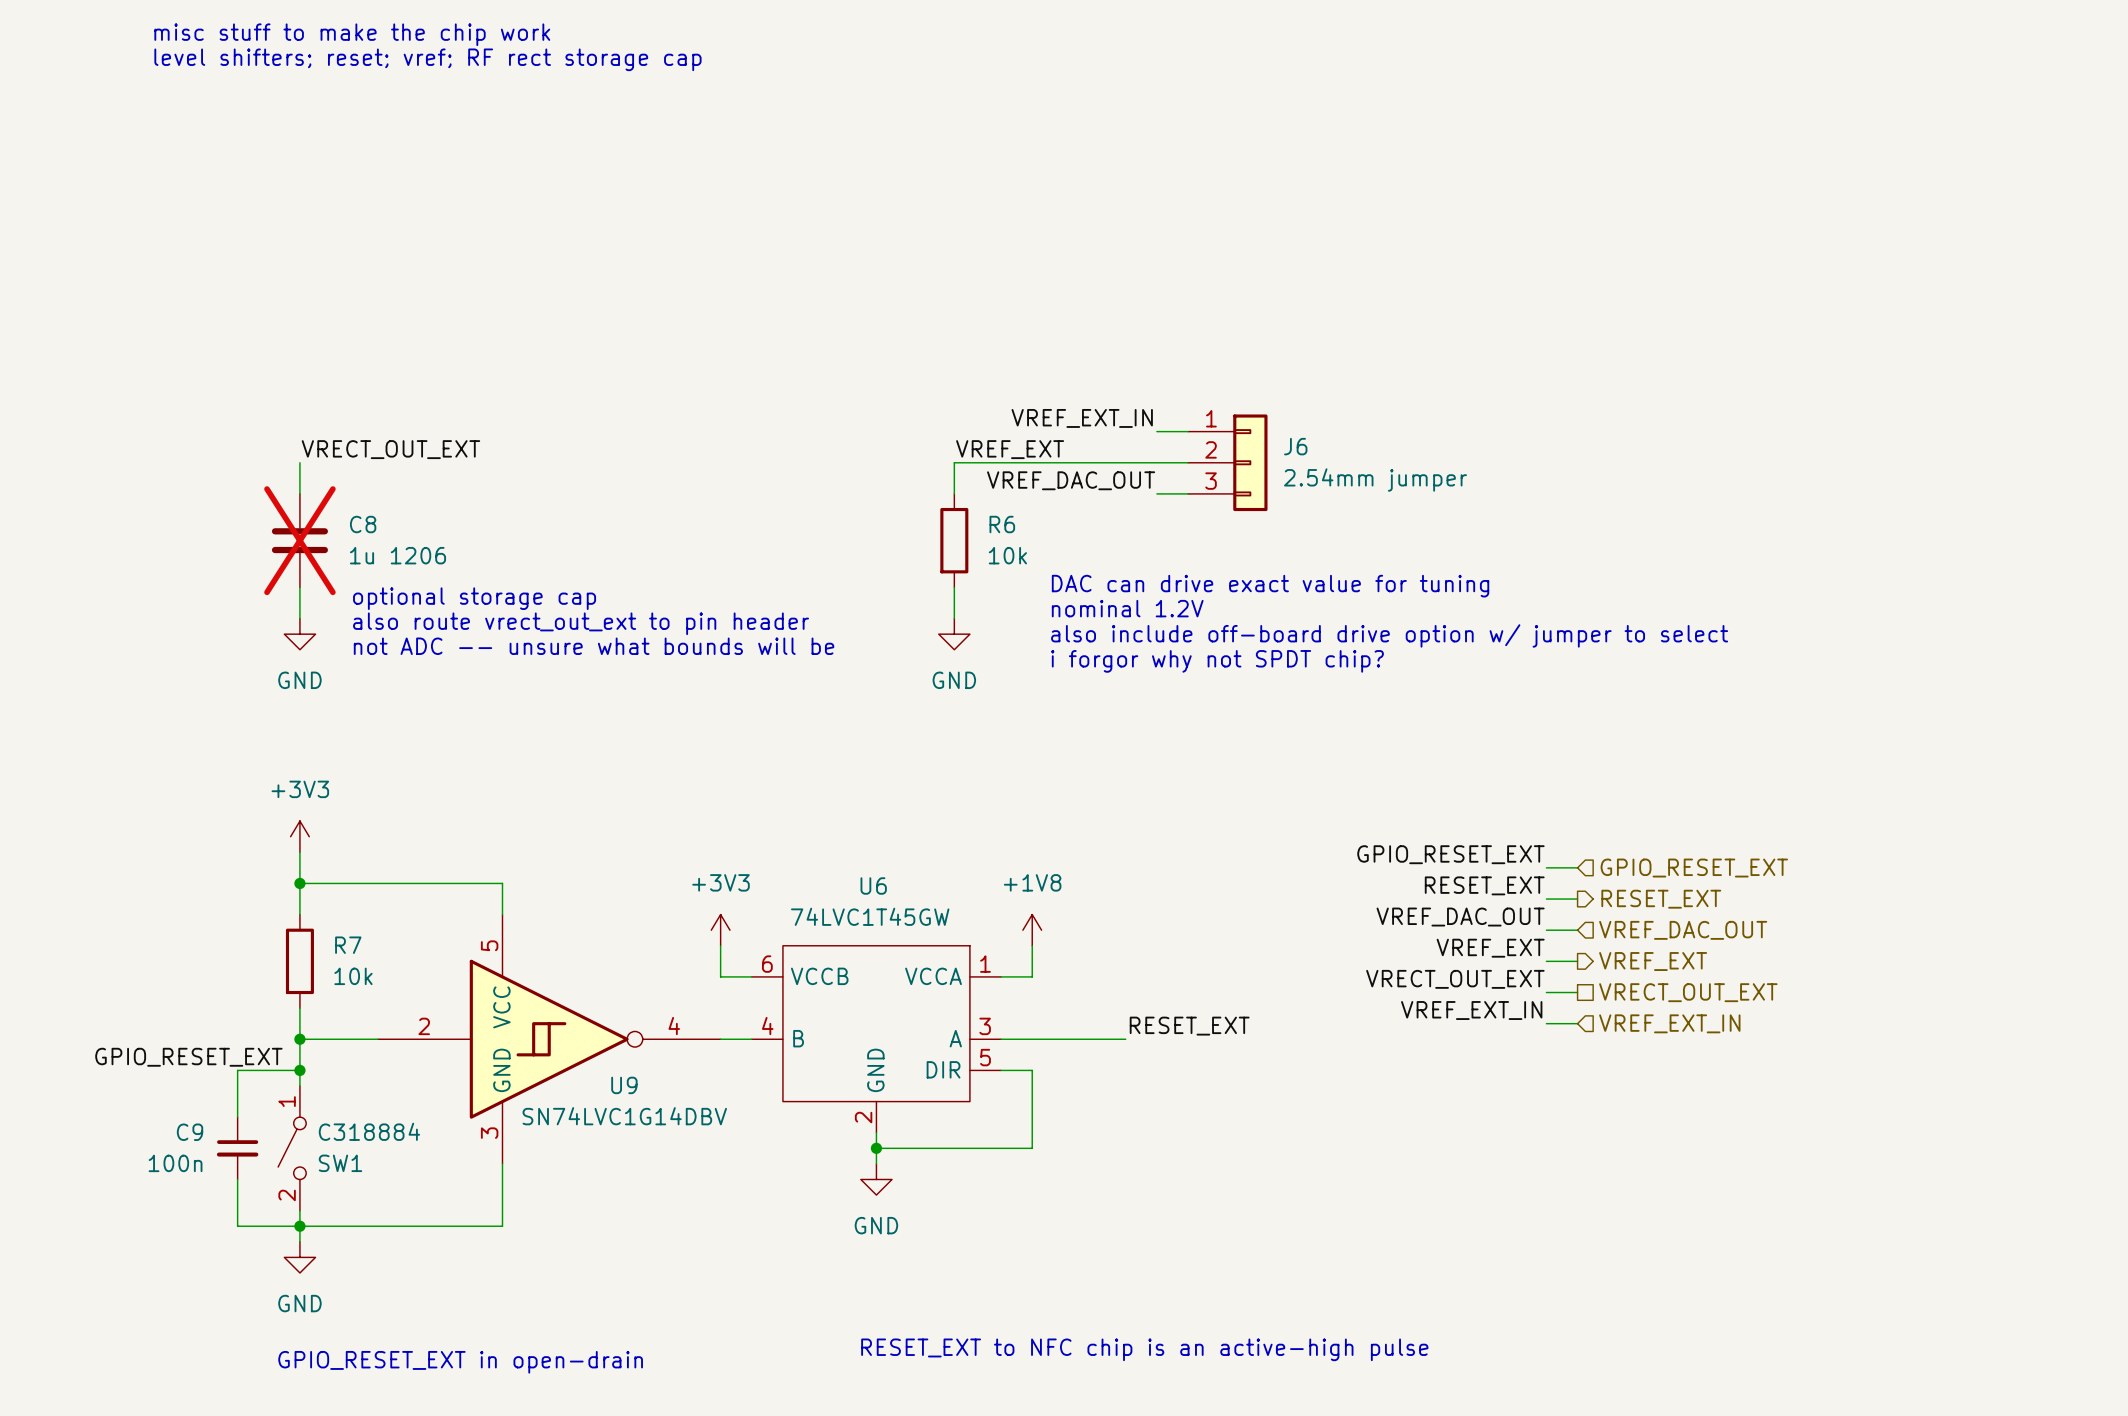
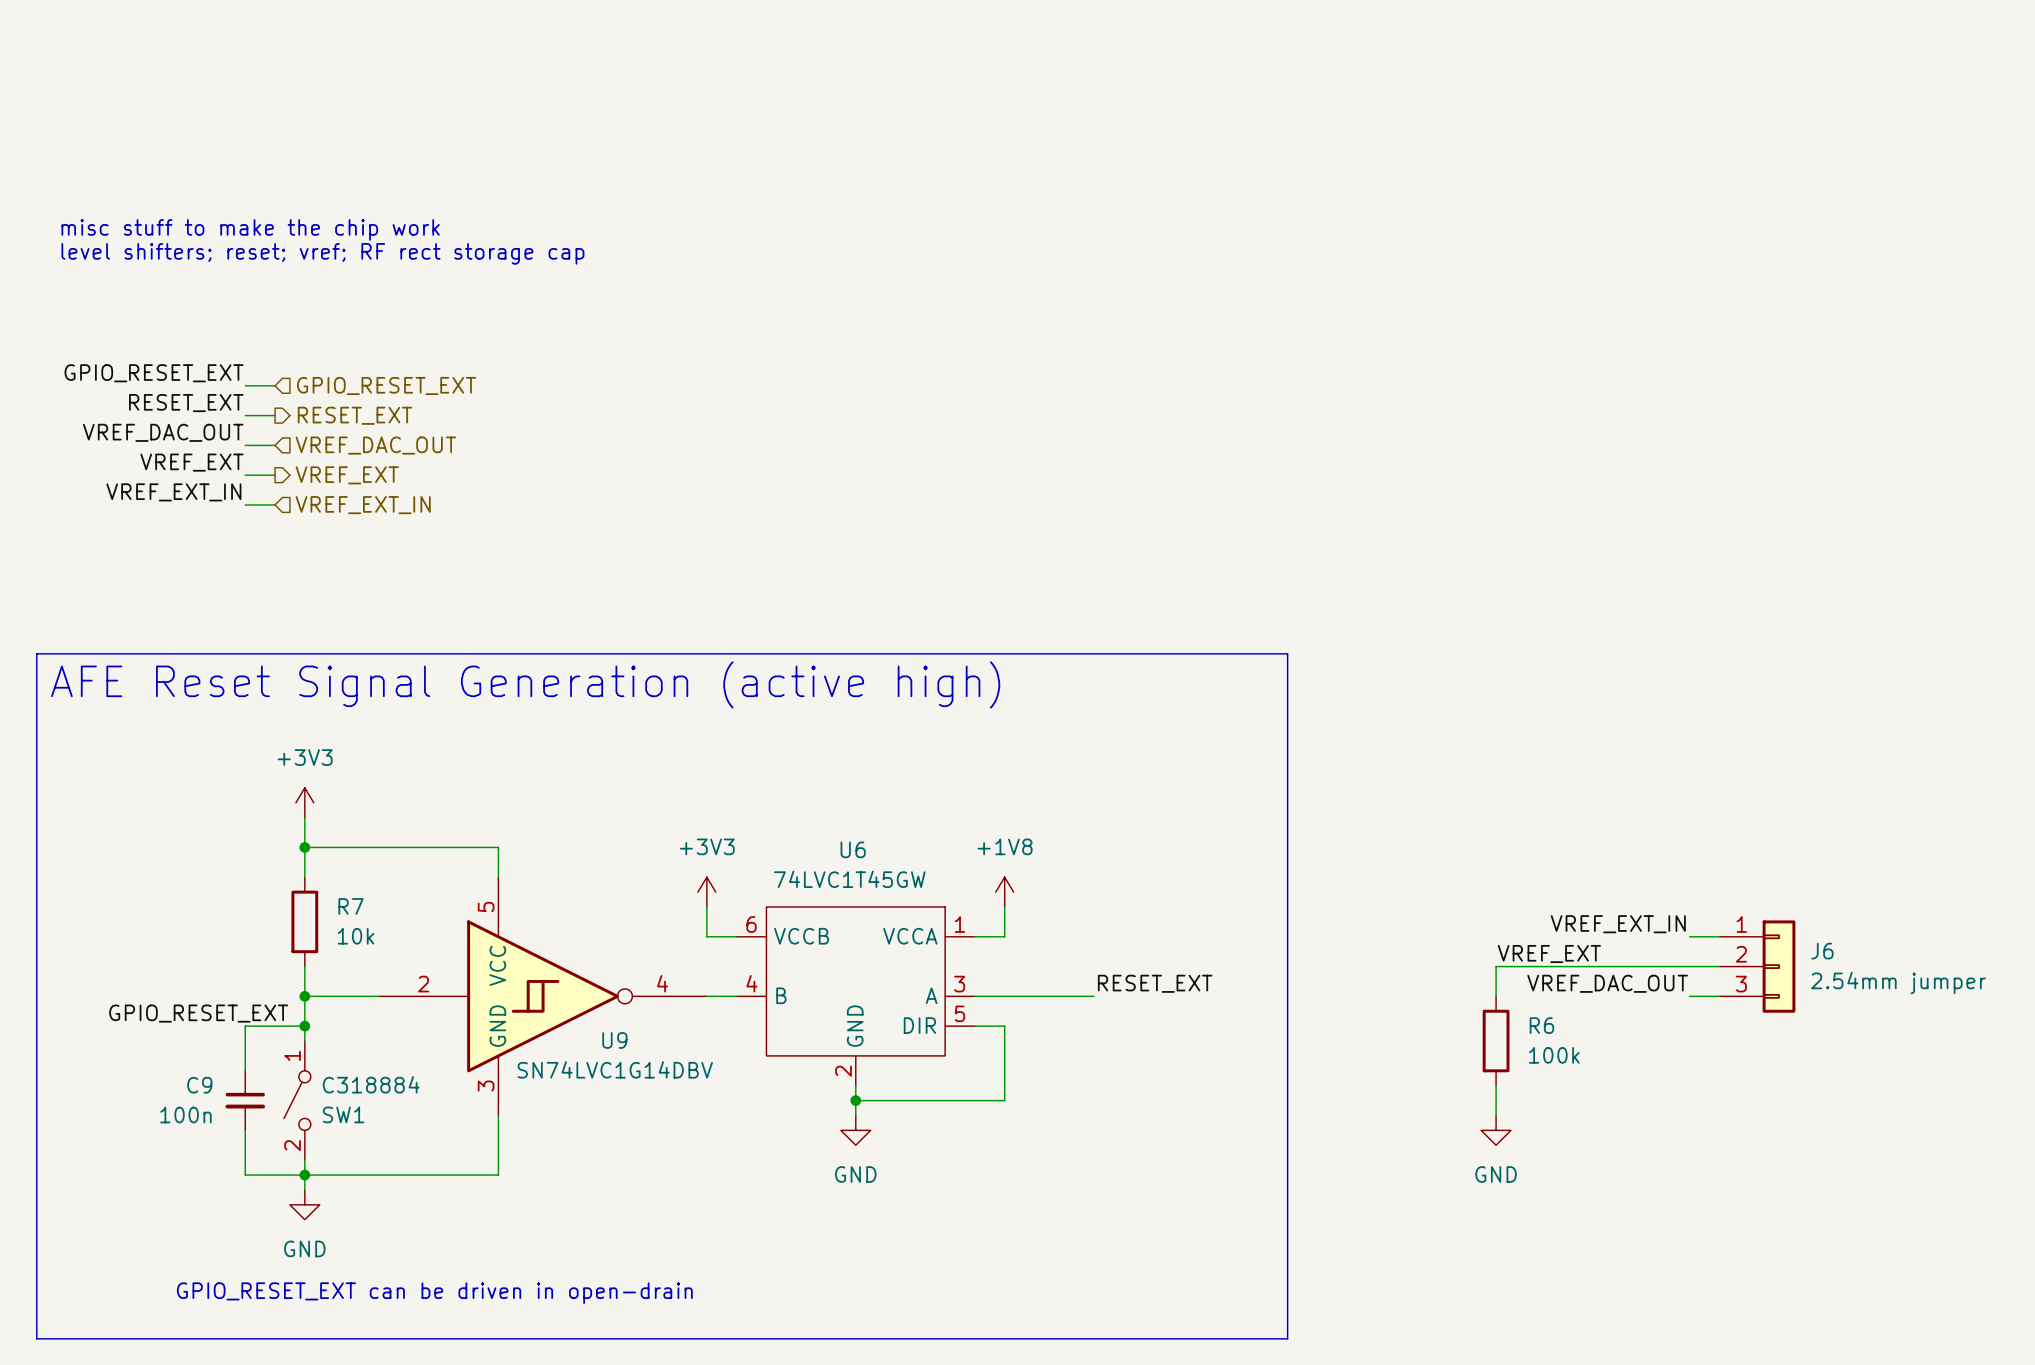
text position: misc stuff to make the chip work (352, 34) -> misc stuff to make the chip work (250, 229)
text position: level shifters; reset; vref; RF rect storage cap (427, 59) -> level shifters; reset; vref; RF rect storage cap (322, 253)
label: none -> GPIO_RESET_EXT (154, 373)
wire: none -> (245, 385) (275, 385)
hierarchical label: none -> GPIO_RESET_EXT (386, 385)
label: none -> RESET_EXT (186, 403)
label: VREF_EXT_IN (1082, 418) -> none
wire: none -> (245, 415) (275, 415)
hierarchical label: none -> RESET_EXT (355, 415)
wire: (1156, 431) (1188, 431) -> none
label: none -> VREF_DAC_OUT (163, 432)
label: VRECT_OUT_EXT (390, 449) -> none
label: VREF_EXT (1010, 449) -> none
wire: none -> (245, 445) (275, 445)
wire: (299, 462) (299, 493) -> none
hierarchical label: none -> VREF_DAC_OUT (375, 445)
wire: (1188, 462) (954, 462) (954, 493) -> none
J6 position: (1227, 462) -> (1757, 966)
label: none -> VREF_EXT (191, 462)
label: VREF_DAC_OUT (1071, 480) -> none
wire: none -> (245, 475) (275, 475)
wire: (1156, 493) (1188, 493) -> none
hierarchical label: none -> VREF_EXT (347, 475)
label: none -> VREF_EXT_IN (173, 492)
wire: none -> (245, 504) (275, 504)
hierarchical label: none -> VREF_EXT_IN (363, 505)
C8: 1u 1206 (299, 540) -> none
R6 position: (954, 540) -> (1496, 1041)
R6 value: 10k (1007, 555) -> 100k (1554, 1055)
text: DAC can drive exact value for tuning (1270, 586) -> none
wire: (299, 587) (299, 618) -> none
wire: (954, 587) (954, 618) -> none
text: optional storage cap (474, 598) -> none
text: nominal 1.2V (1127, 608) -> none
text: also route vrect_out_ext to pin header (581, 623) -> none
power symbol: GND (299, 634) -> none
power symbol: GND (954, 634) -> none
text: also include off-board drive option w/ jumper to select (1389, 635) -> none
text: not ADC -- unsure what bounds will be (594, 646) -> none
text: i forgor why not SPDT chip? (1217, 661) -> none
line: none -> (36, 653) (1287, 653) (1287, 1338) (36, 1338) (36, 653)
text: none -> AFE Reset Signal Generation (active high) (525, 684)
label: GPIO_RESET_EXT (1450, 854) -> none
wire: (1546, 867) (1577, 867) -> none
hierarchical label: GPIO_RESET_EXT (1694, 868) -> none
label: RESET_EXT (1484, 885) -> none
wire: (1546, 899) (1577, 899) -> none
hierarchical label: RESET_EXT (1661, 899) -> none
label position: VREF_DAC_OUT (1460, 917) -> VREF_DAC_OUT (1607, 983)
wire: (1546, 930) (1577, 930) -> none
hierarchical label: VREF_DAC_OUT (1683, 930) -> none
label position: VREF_EXT (1490, 948) -> VREF_EXT (1549, 954)
wire: (1546, 961) (1577, 961) -> (1689, 936) (1719, 936)
hierarchical label: VREF_EXT (1653, 961) -> none
label: VRECT_OUT_EXT (1455, 979) -> none
wire: (1546, 992) (1577, 992) -> none
hierarchical label: VRECT_OUT_EXT (1688, 992) -> none
wire: none -> (1719, 966) (1496, 966) (1496, 996)
label position: VREF_EXT_IN (1471, 1010) -> VREF_EXT_IN (1618, 924)
wire: (1546, 1023) (1577, 1023) -> (1689, 996) (1719, 996)
hierarchical label: VREF_EXT_IN (1669, 1023) -> none
wire: none -> (1496, 1085) (1496, 1115)
power symbol: none -> GND (1496, 1130)
text: RESET_EXT to NFC chip is an active-high pulse (1144, 1349) -> none
text: GPIO_RESET_EXT in open-drain (460, 1362) -> GPIO_RESET_EXT can be driven in open-drain (434, 1293)

